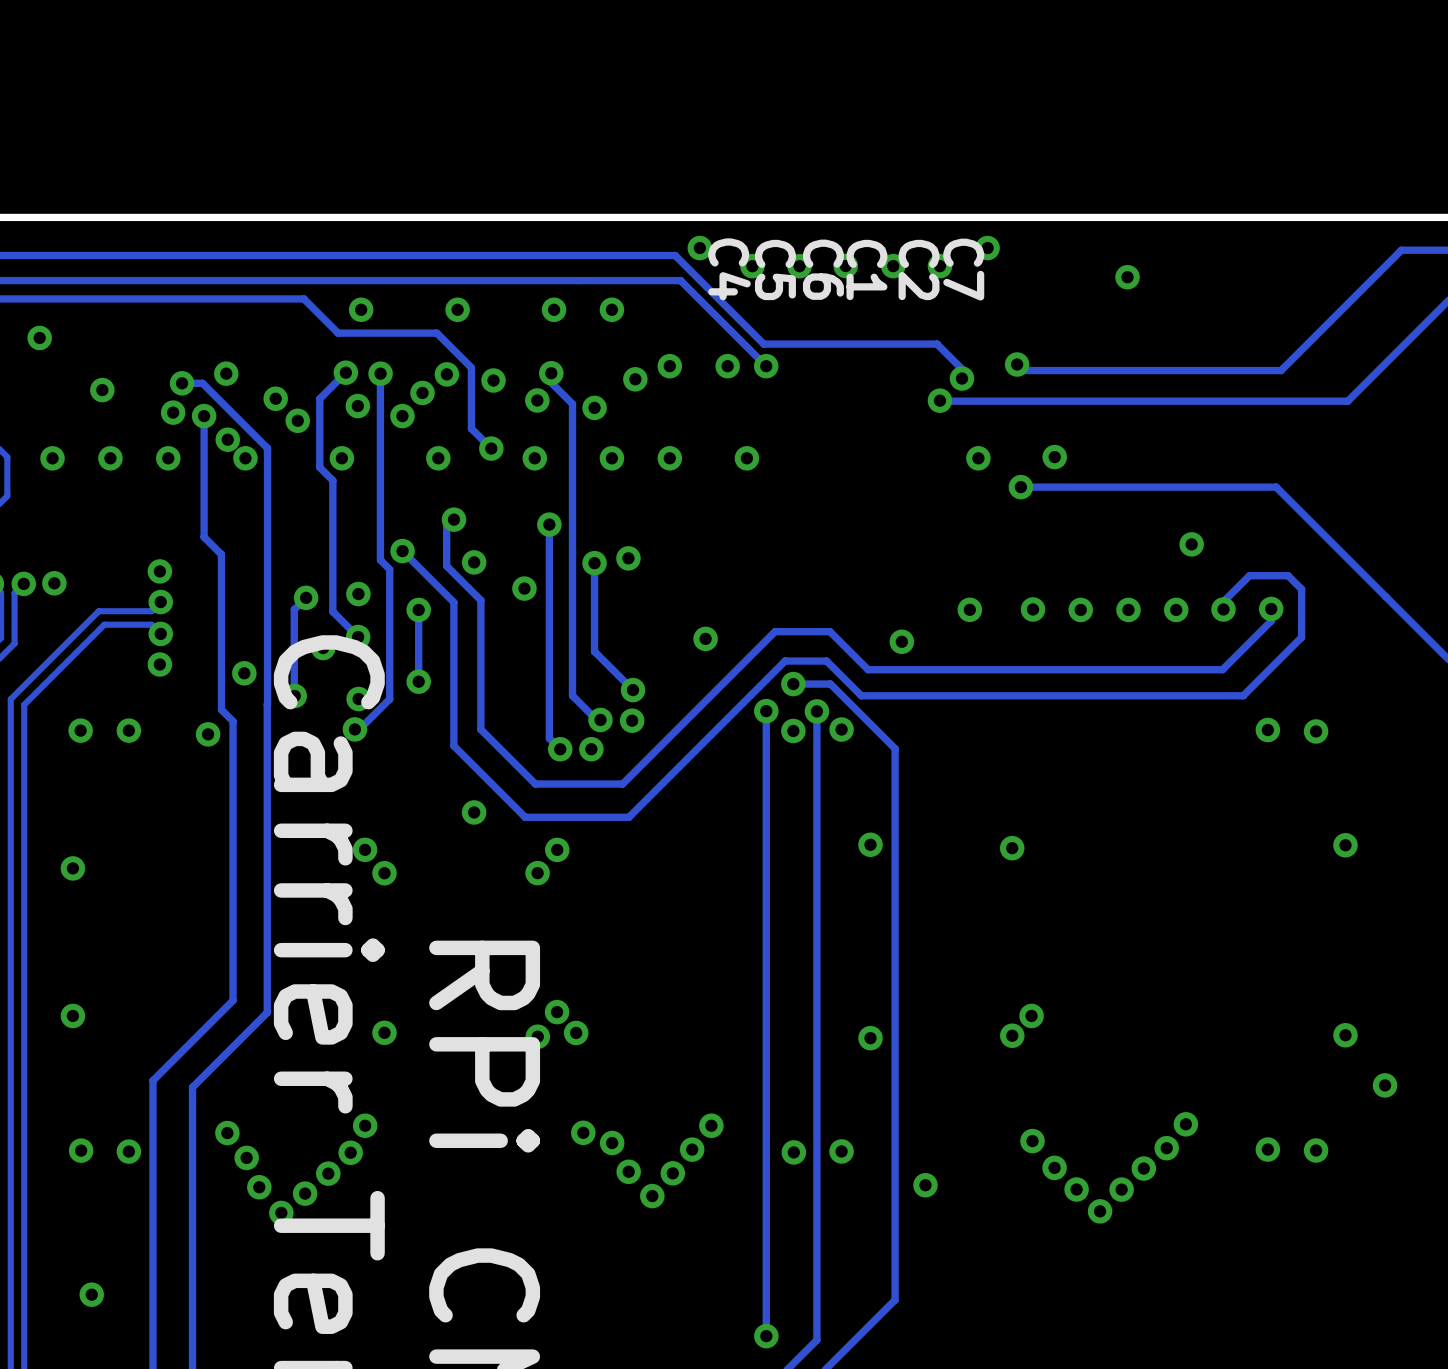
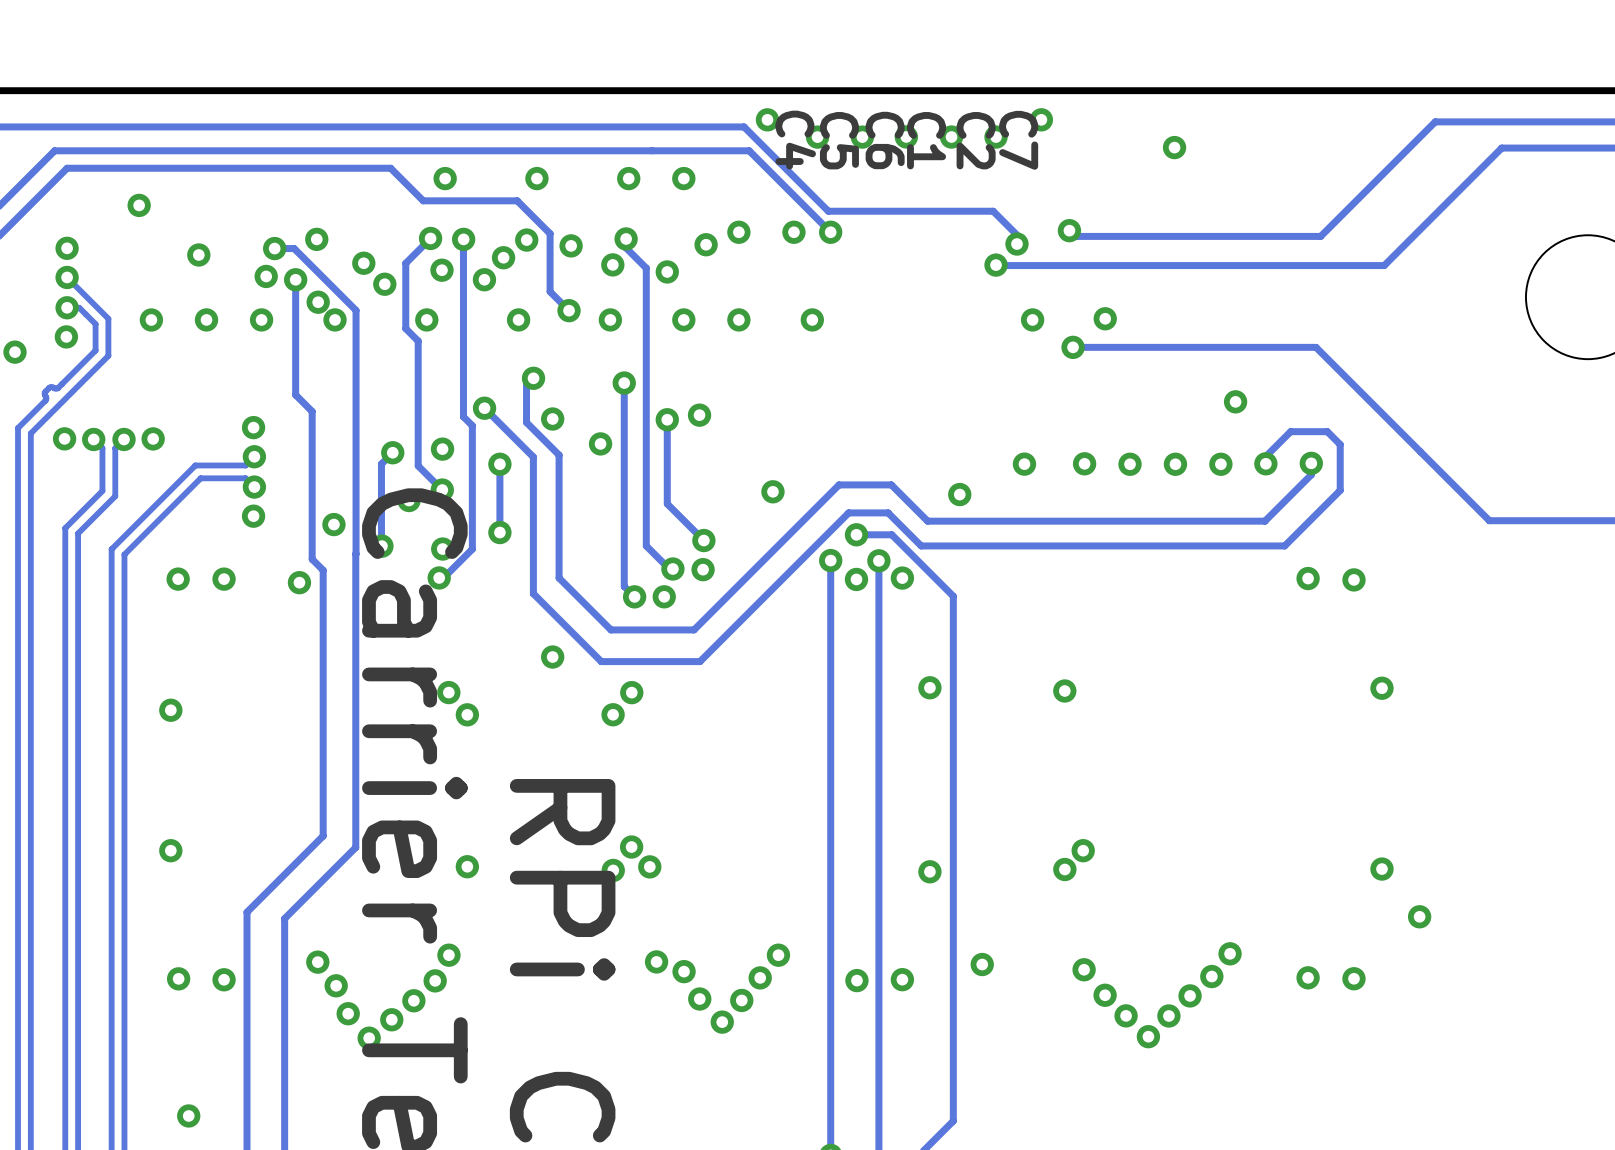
via position: (925, 1185) -> (982, 964)

